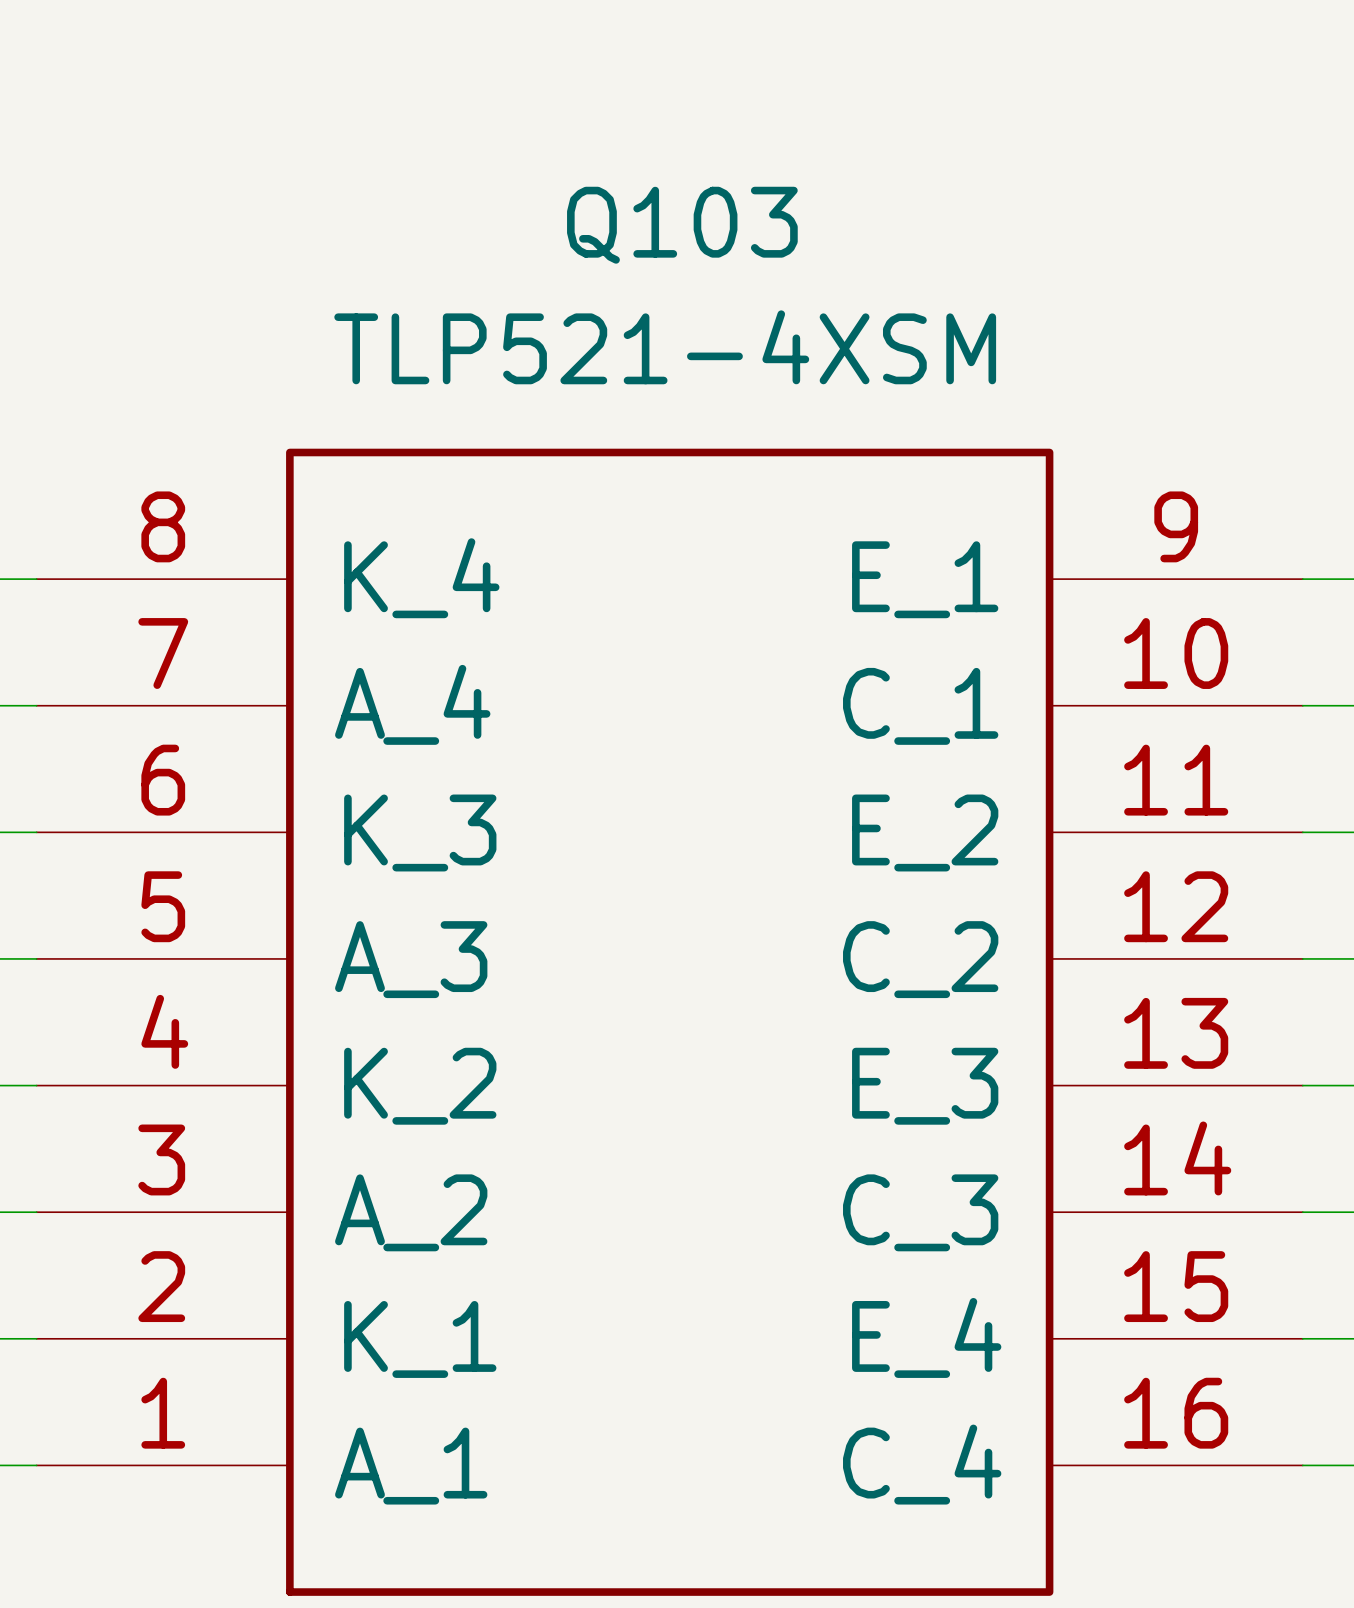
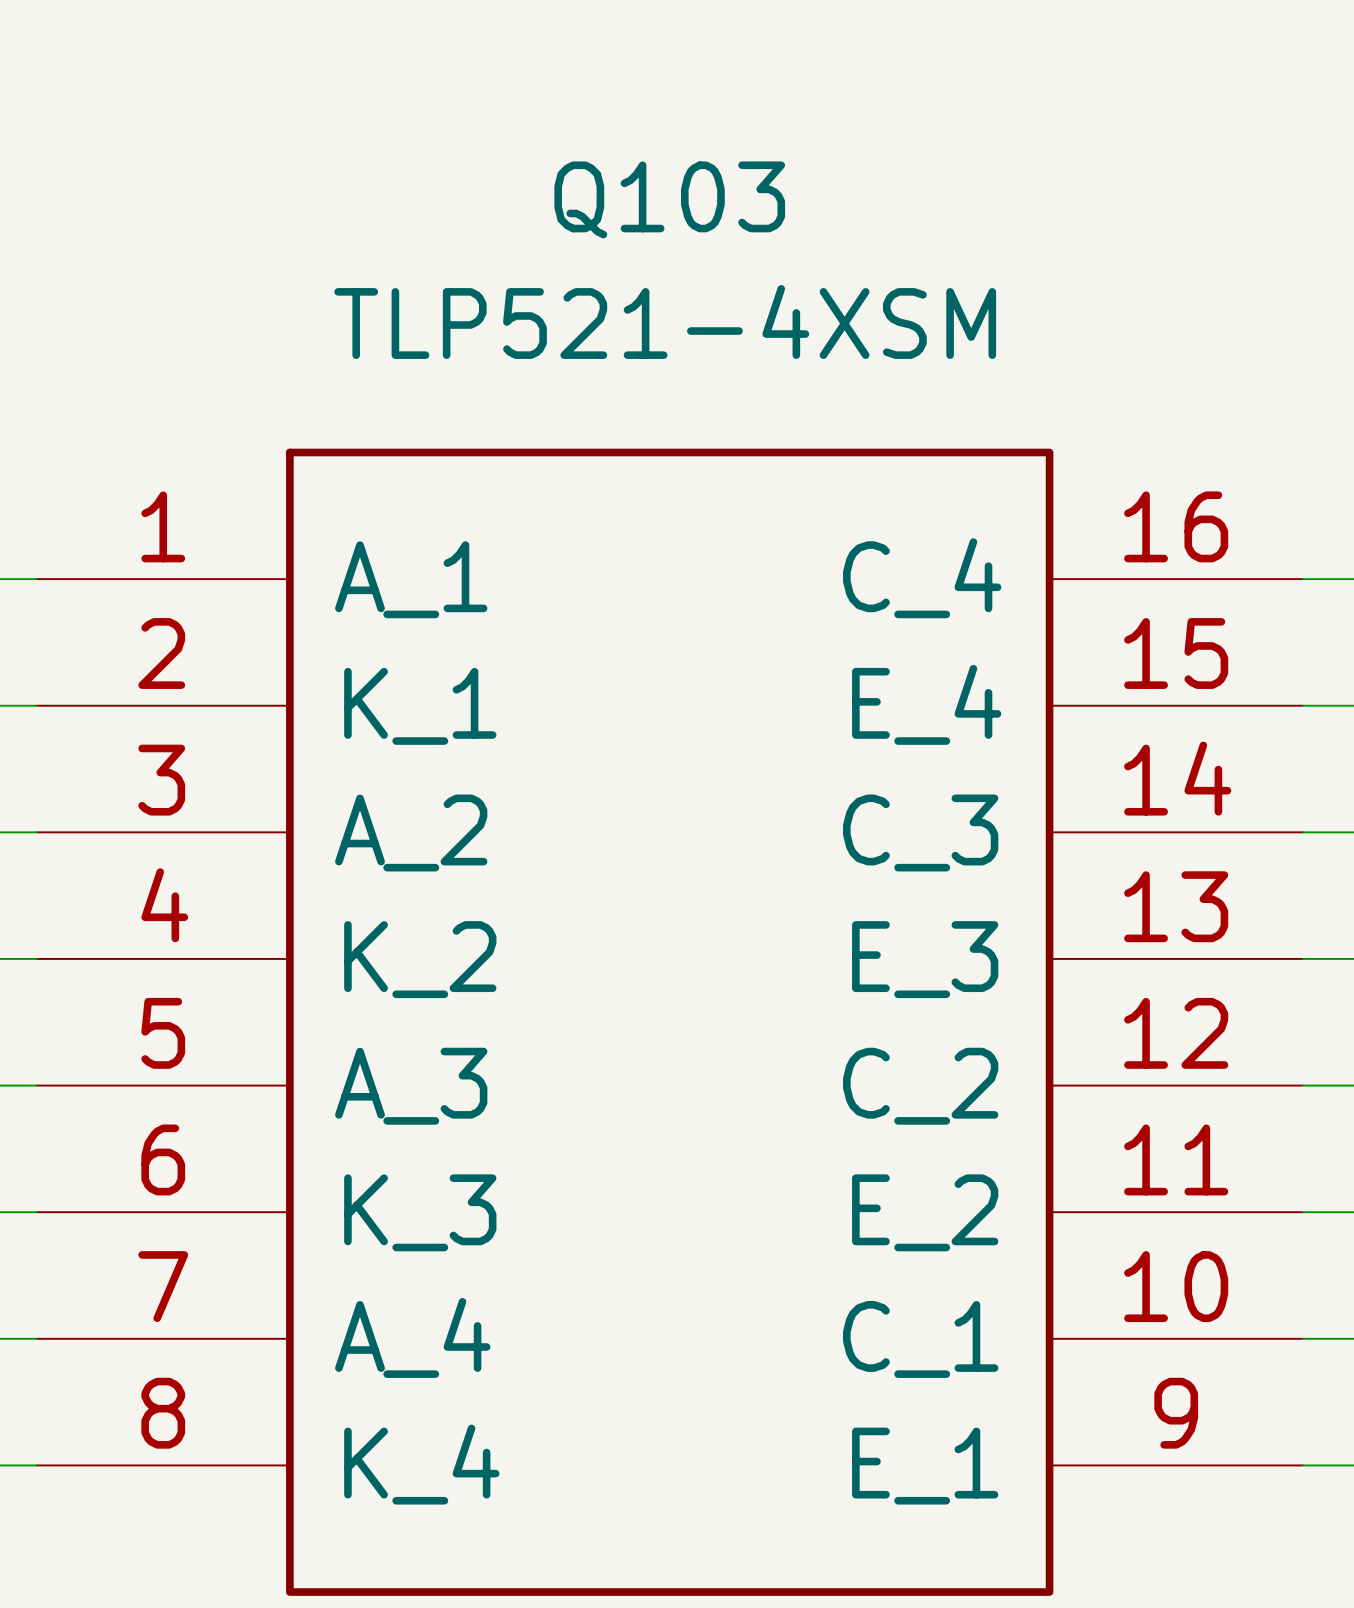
Q103 flip: as is (669, 1022) -> up-down (669, 1022)

